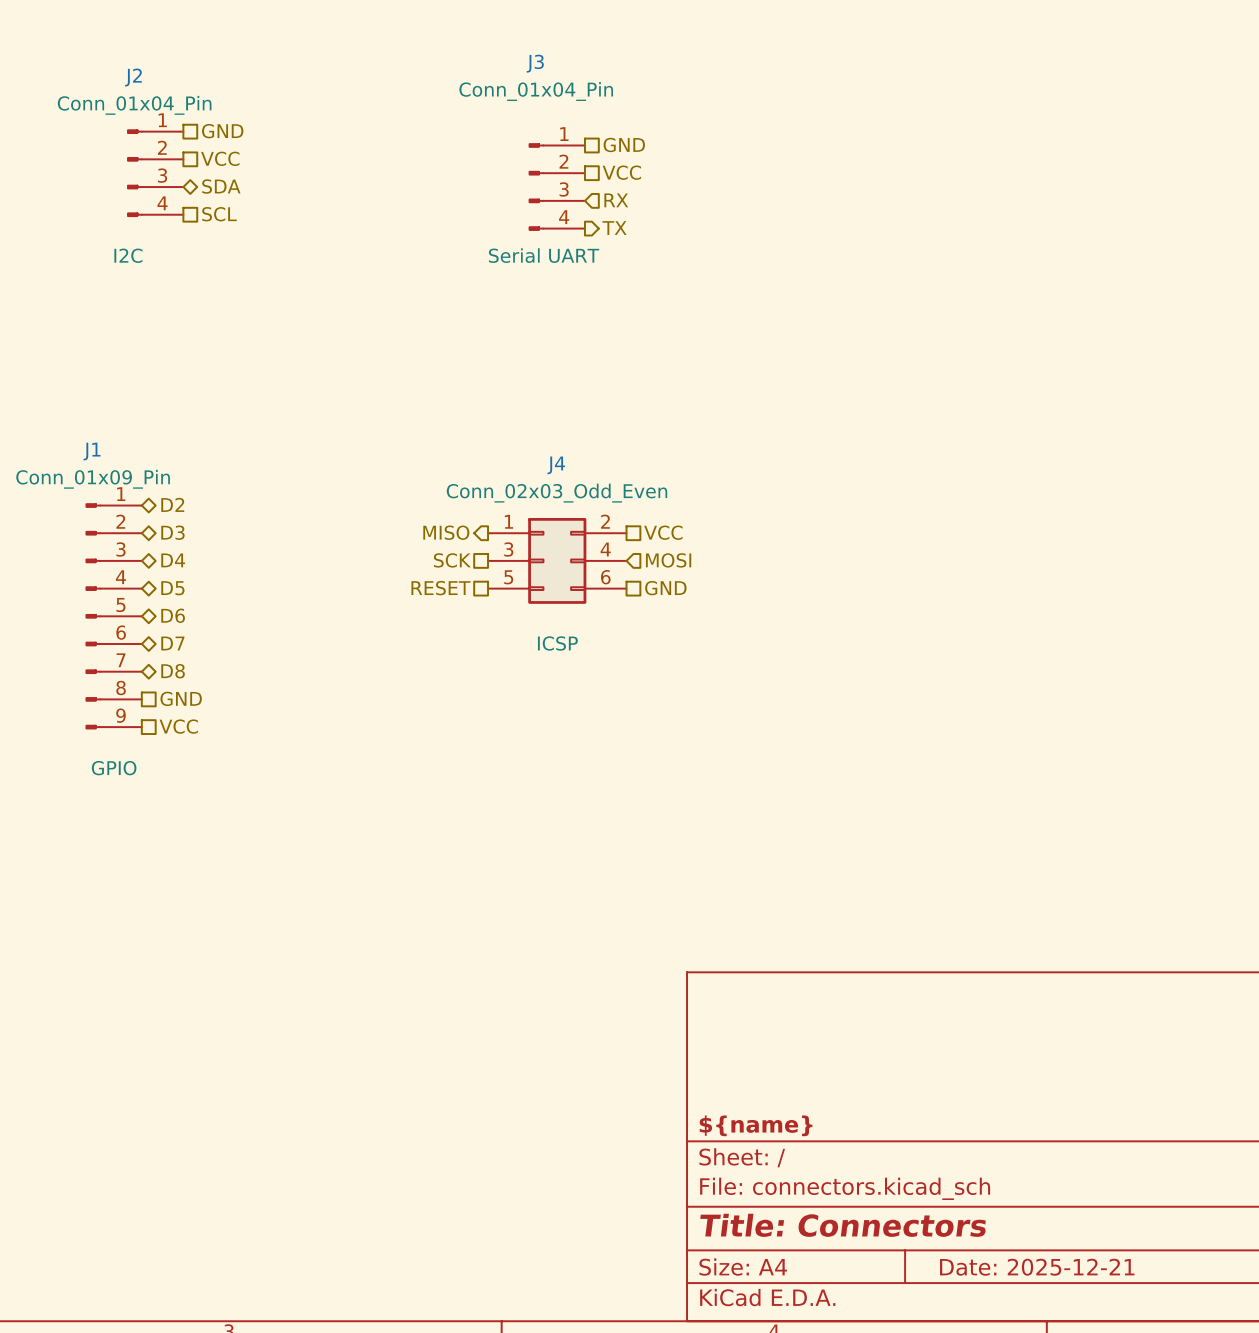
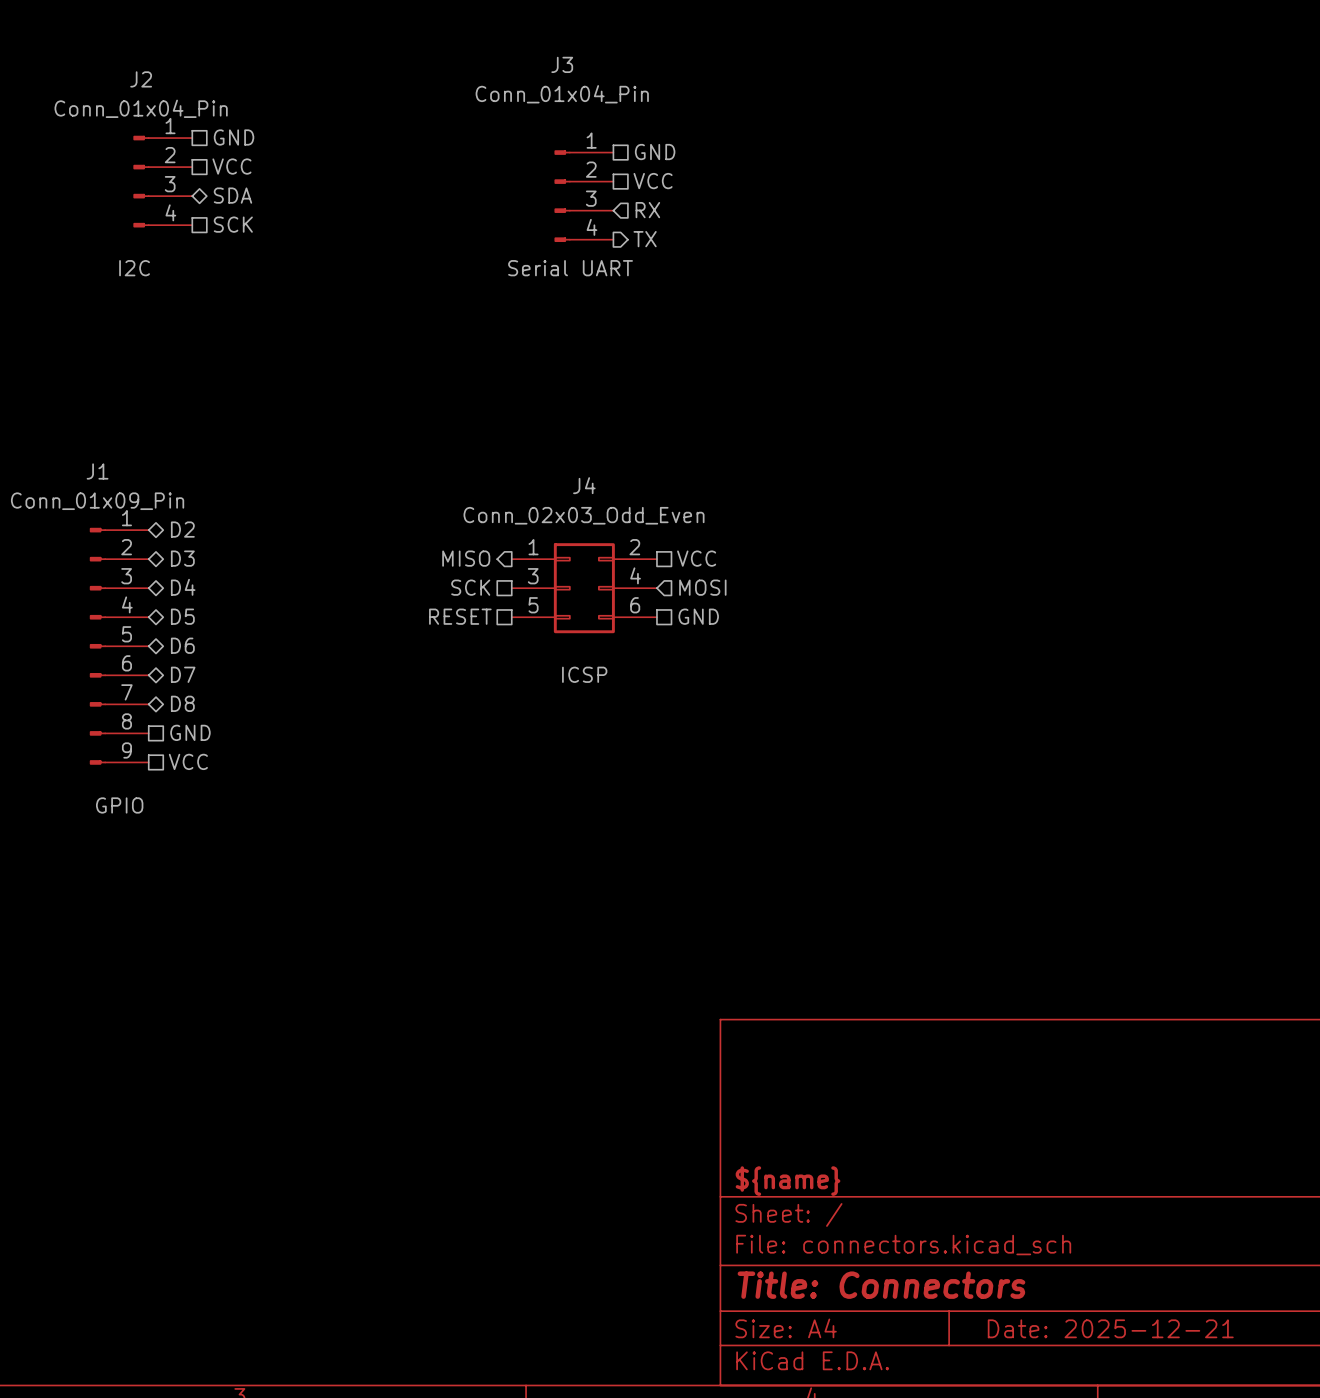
hierarchical label: SCL (219, 214) -> SCK (233, 224)

